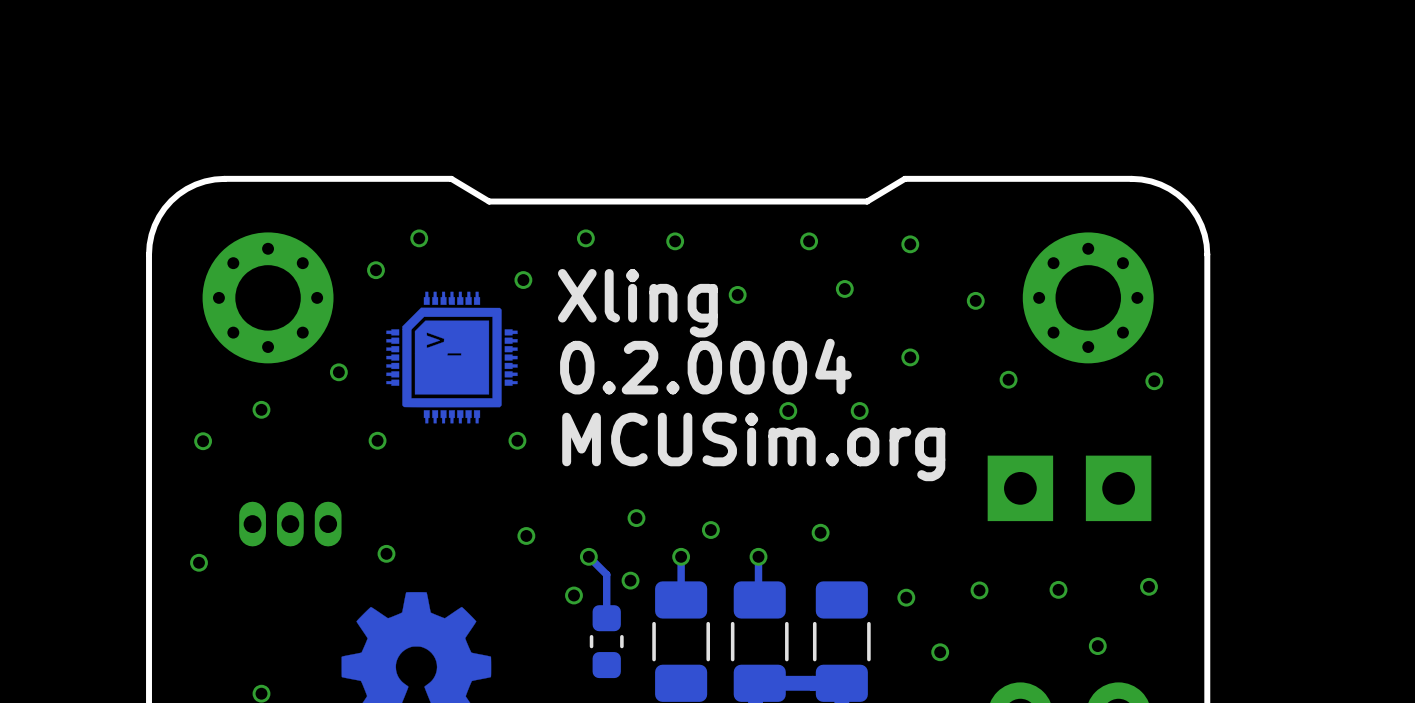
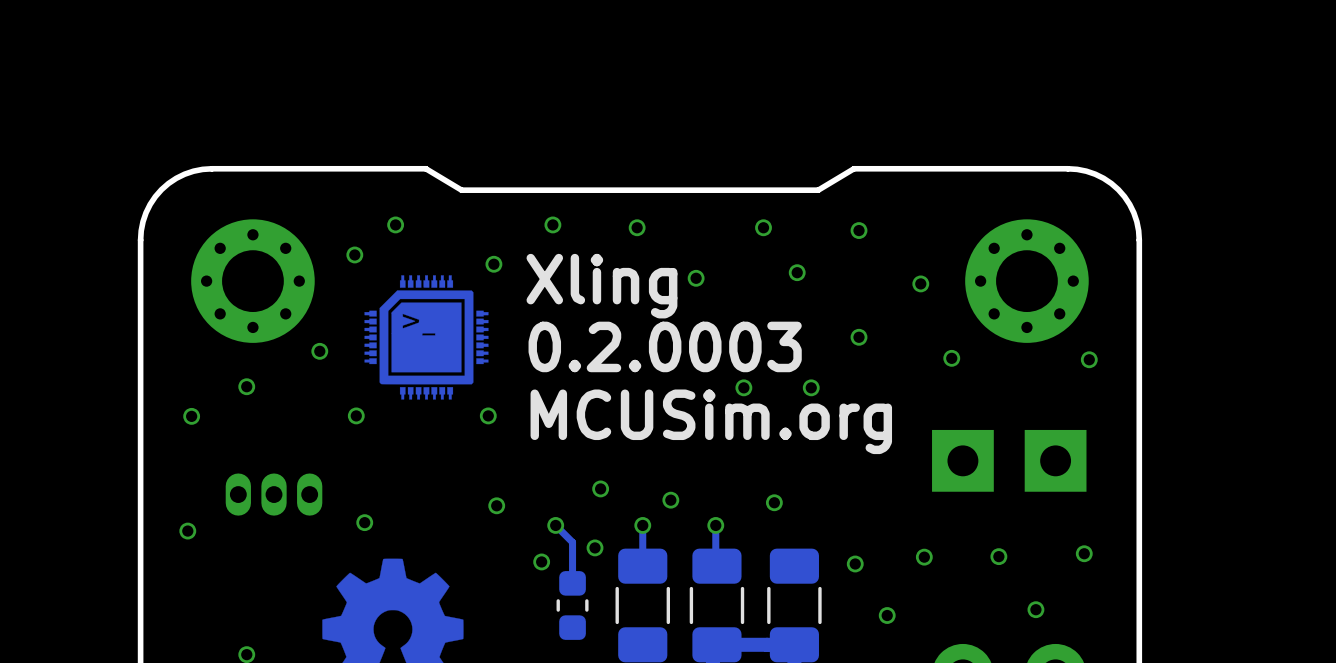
text: 0.2.0004 (705, 366) -> 0.2.0003 (665, 346)

